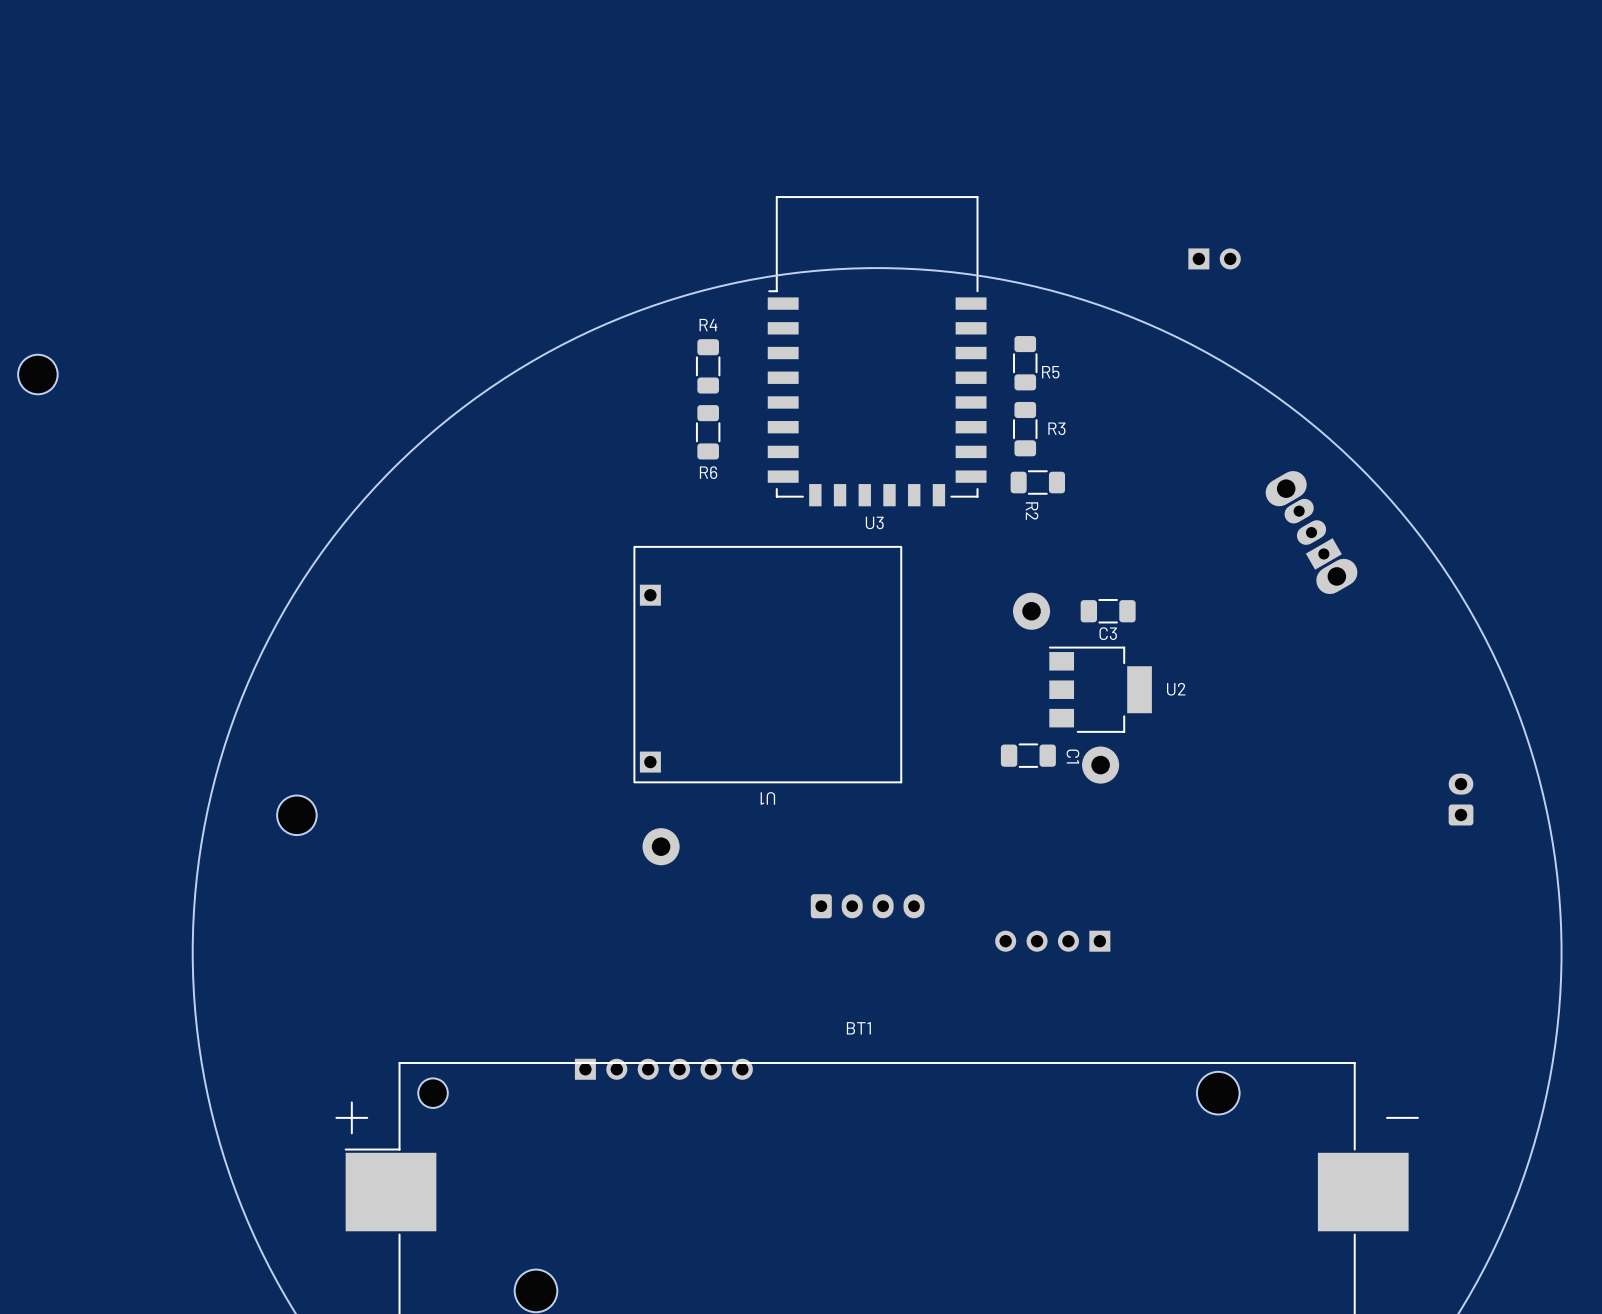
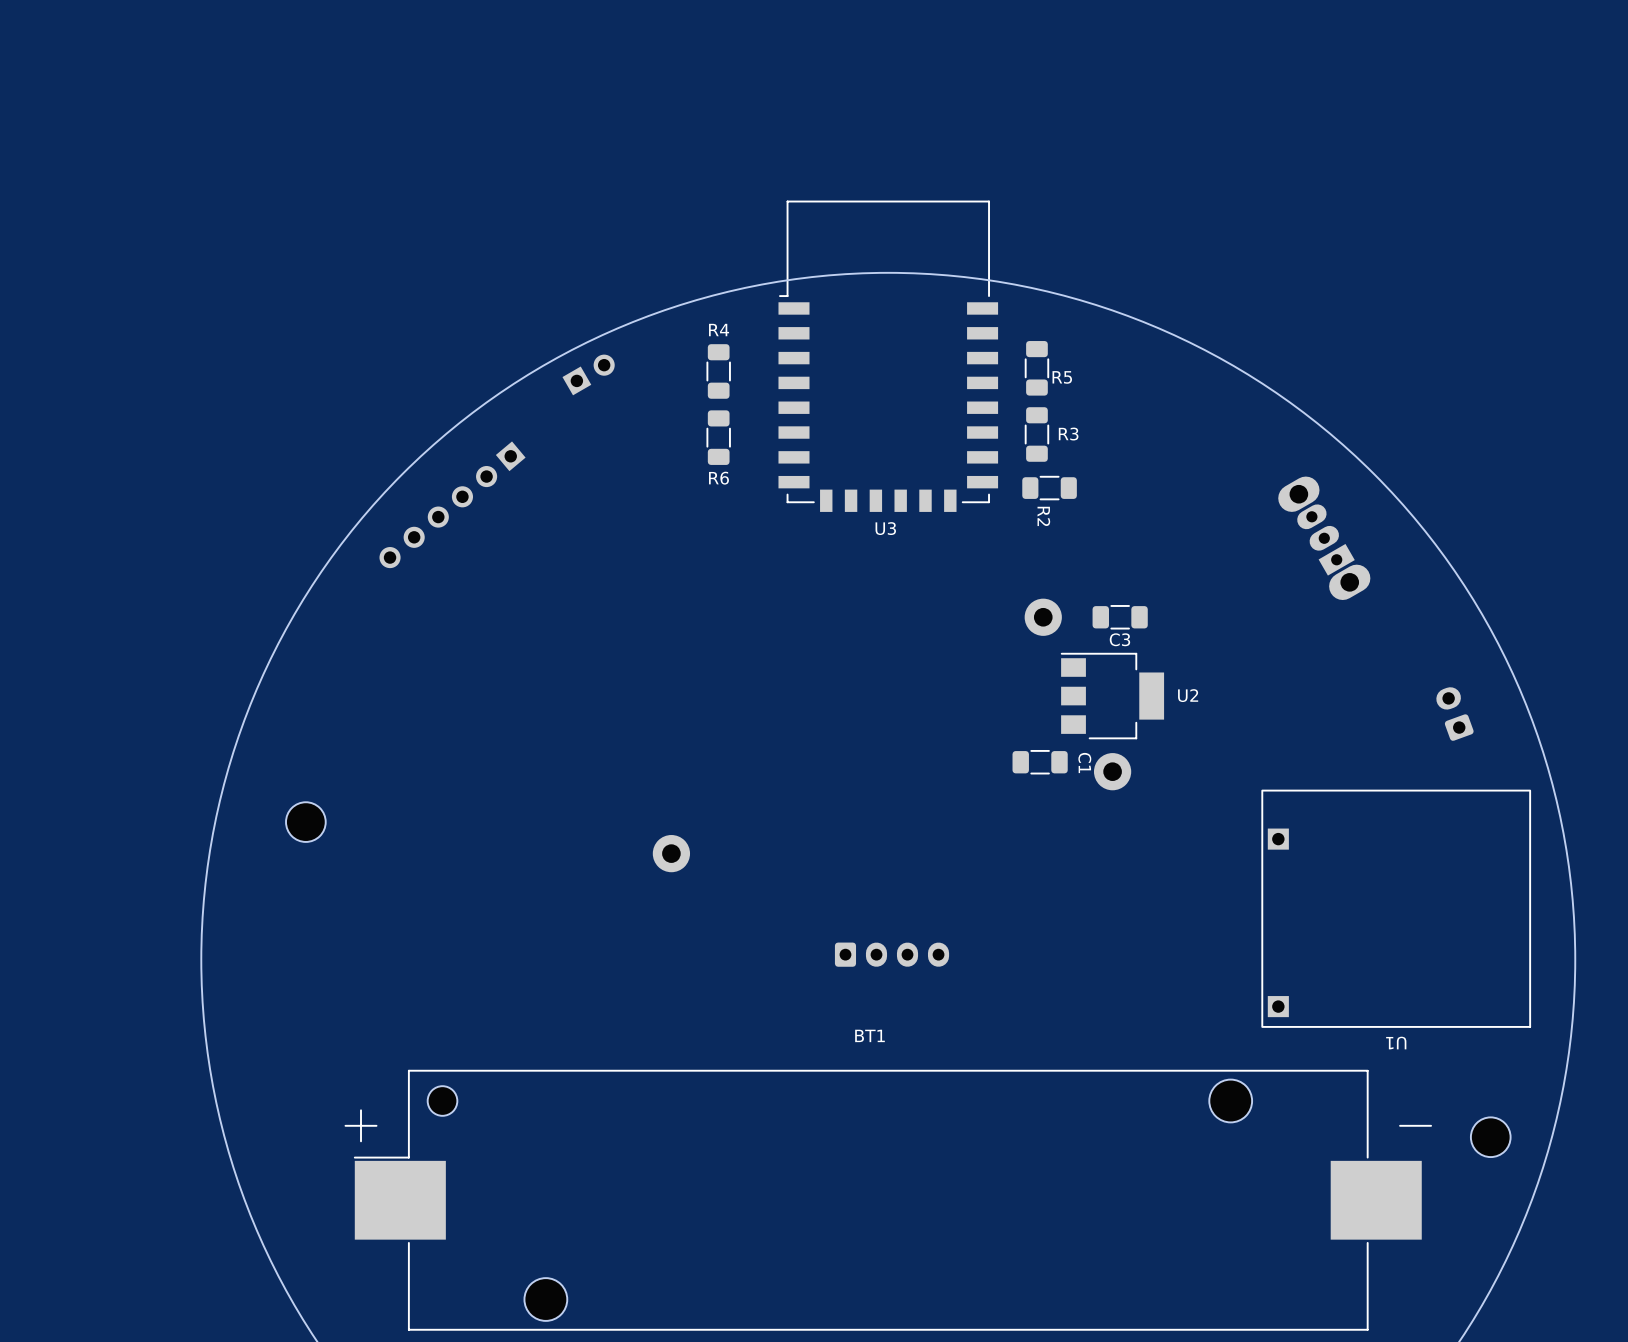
part: (1214, 258) -> none
part: none -> (588, 374)
part: (37, 374) -> none
part: none -> (452, 504)
U1 position: (767, 664) -> (1396, 908)
part: none -> (1454, 714)
part: (1461, 799) -> none
part position: (867, 906) -> (892, 954)
part: (1052, 941) -> none
part: (663, 1069) -> none
part: none -> (1490, 1137)

